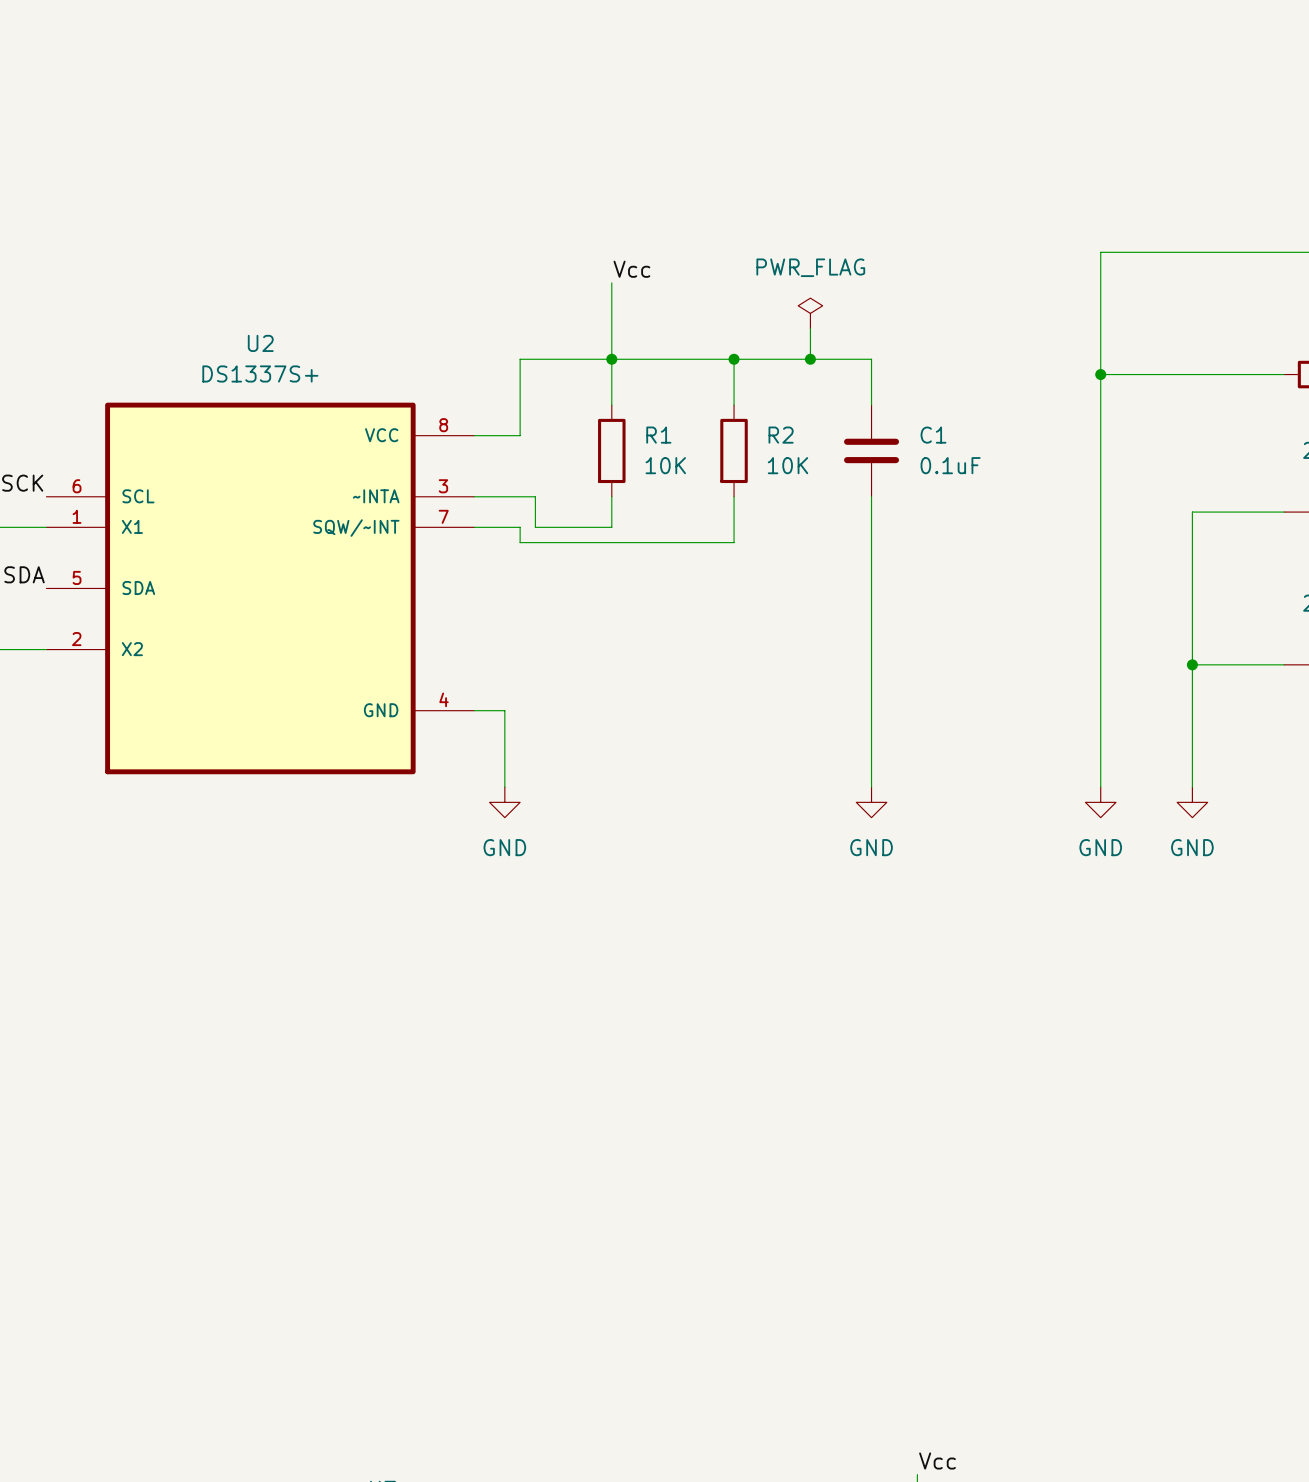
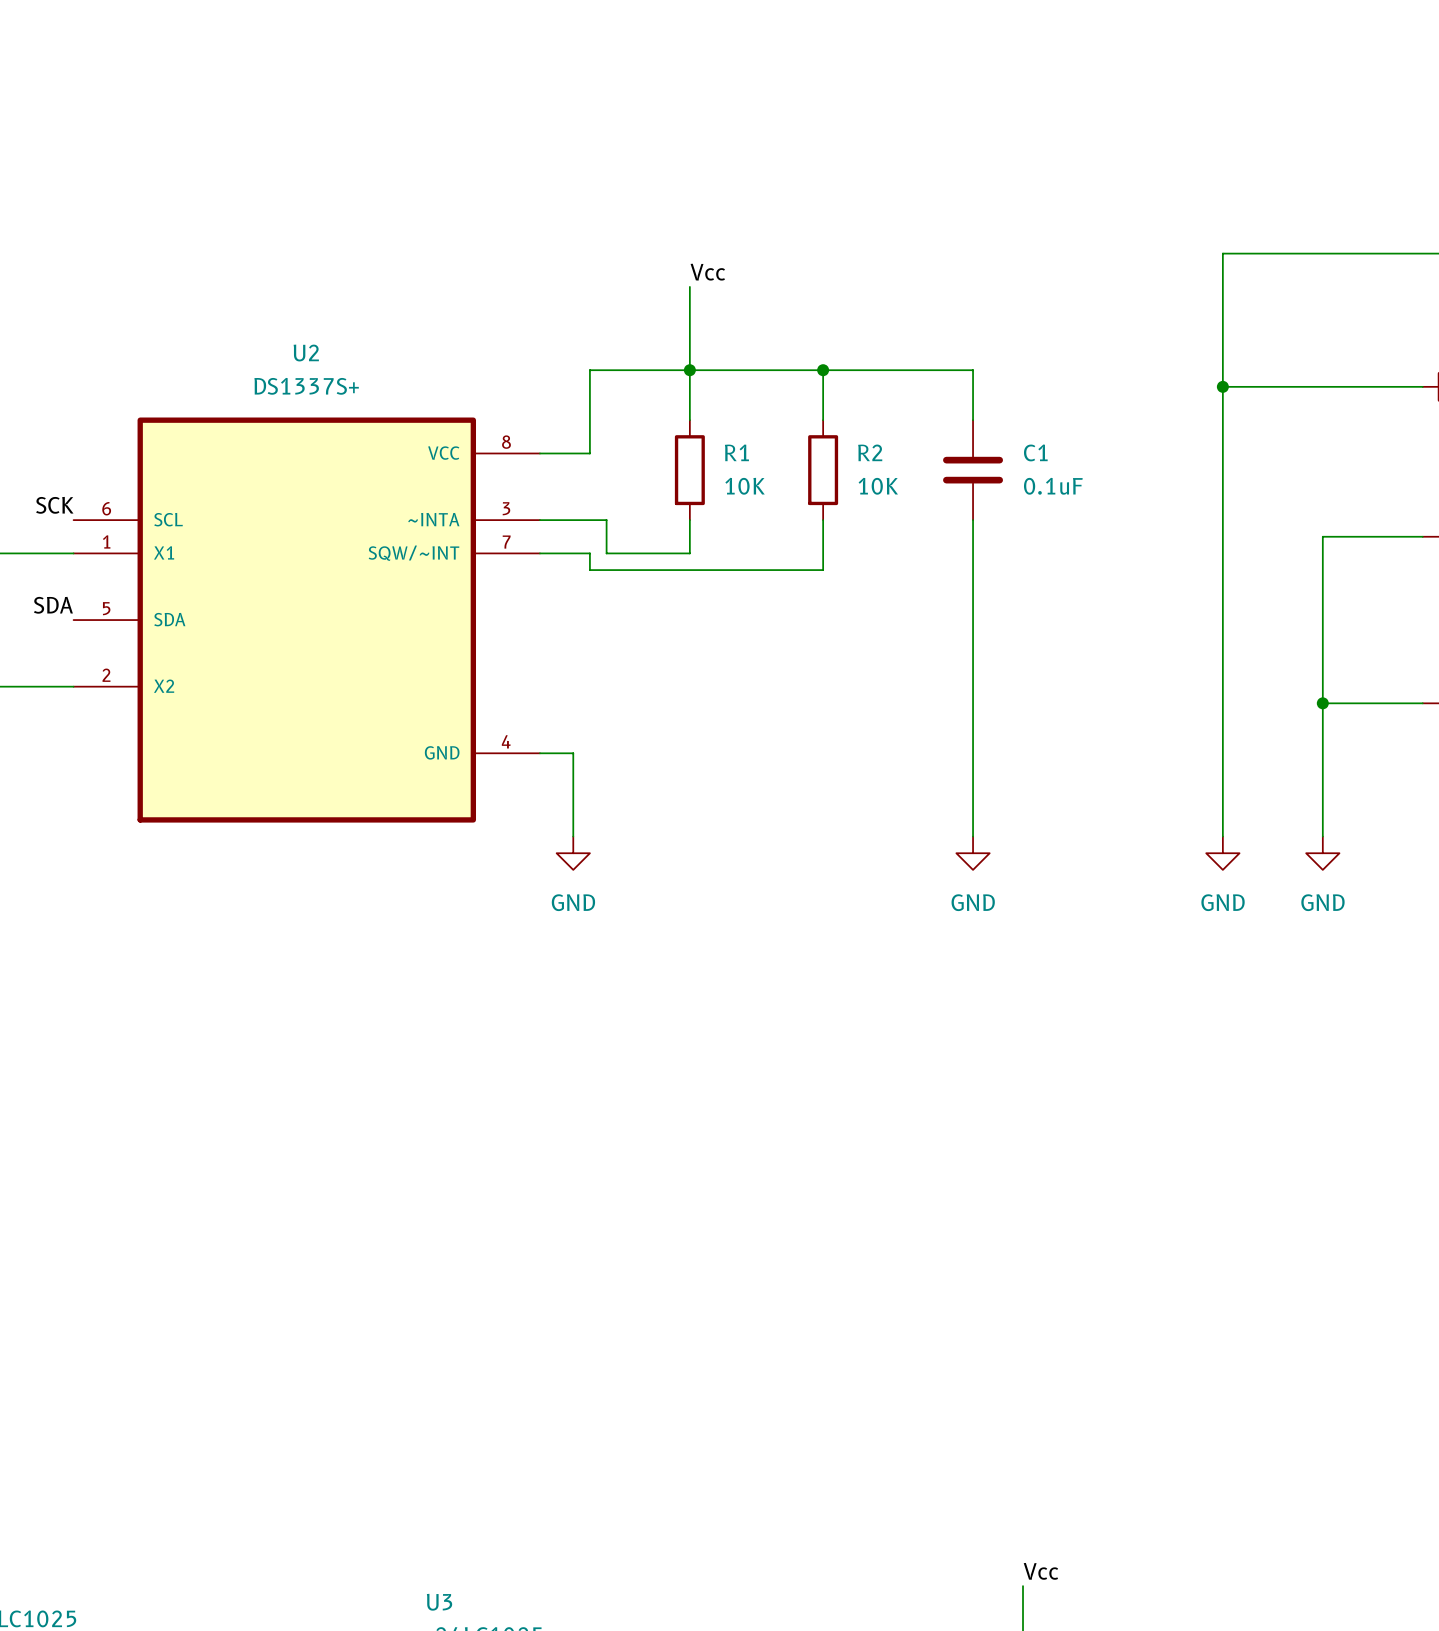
power symbol: PWR_FLAG (810, 313) -> none
wire: (810, 328) (810, 359) -> none
junction: (810, 359) -> none

